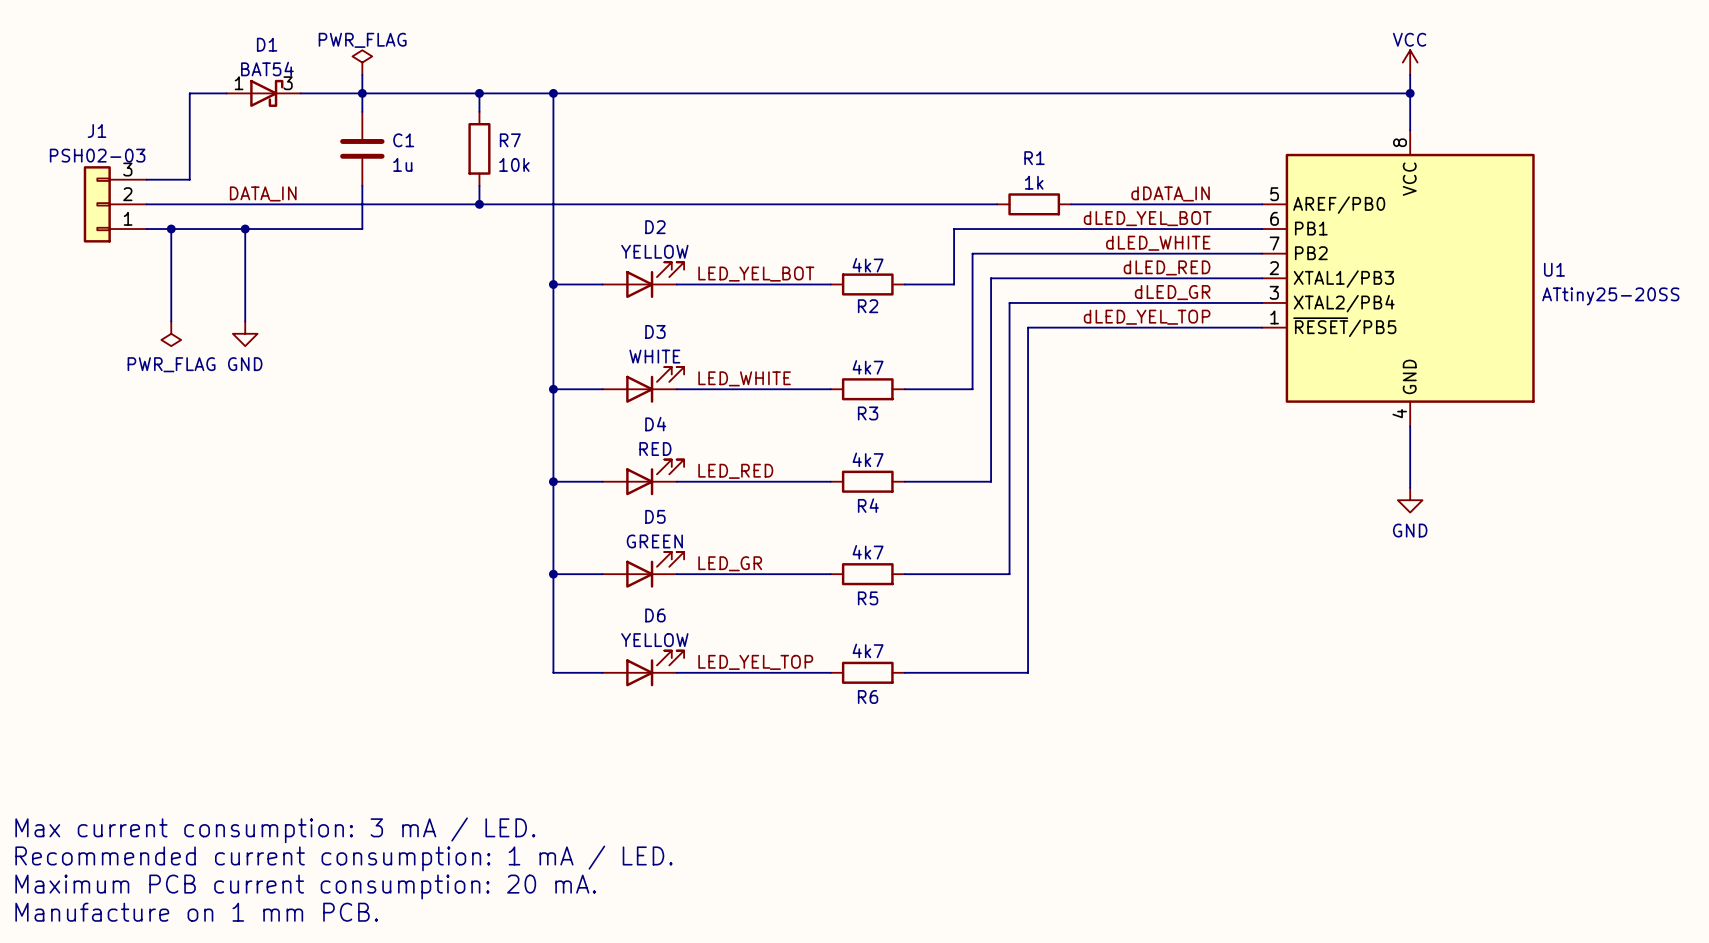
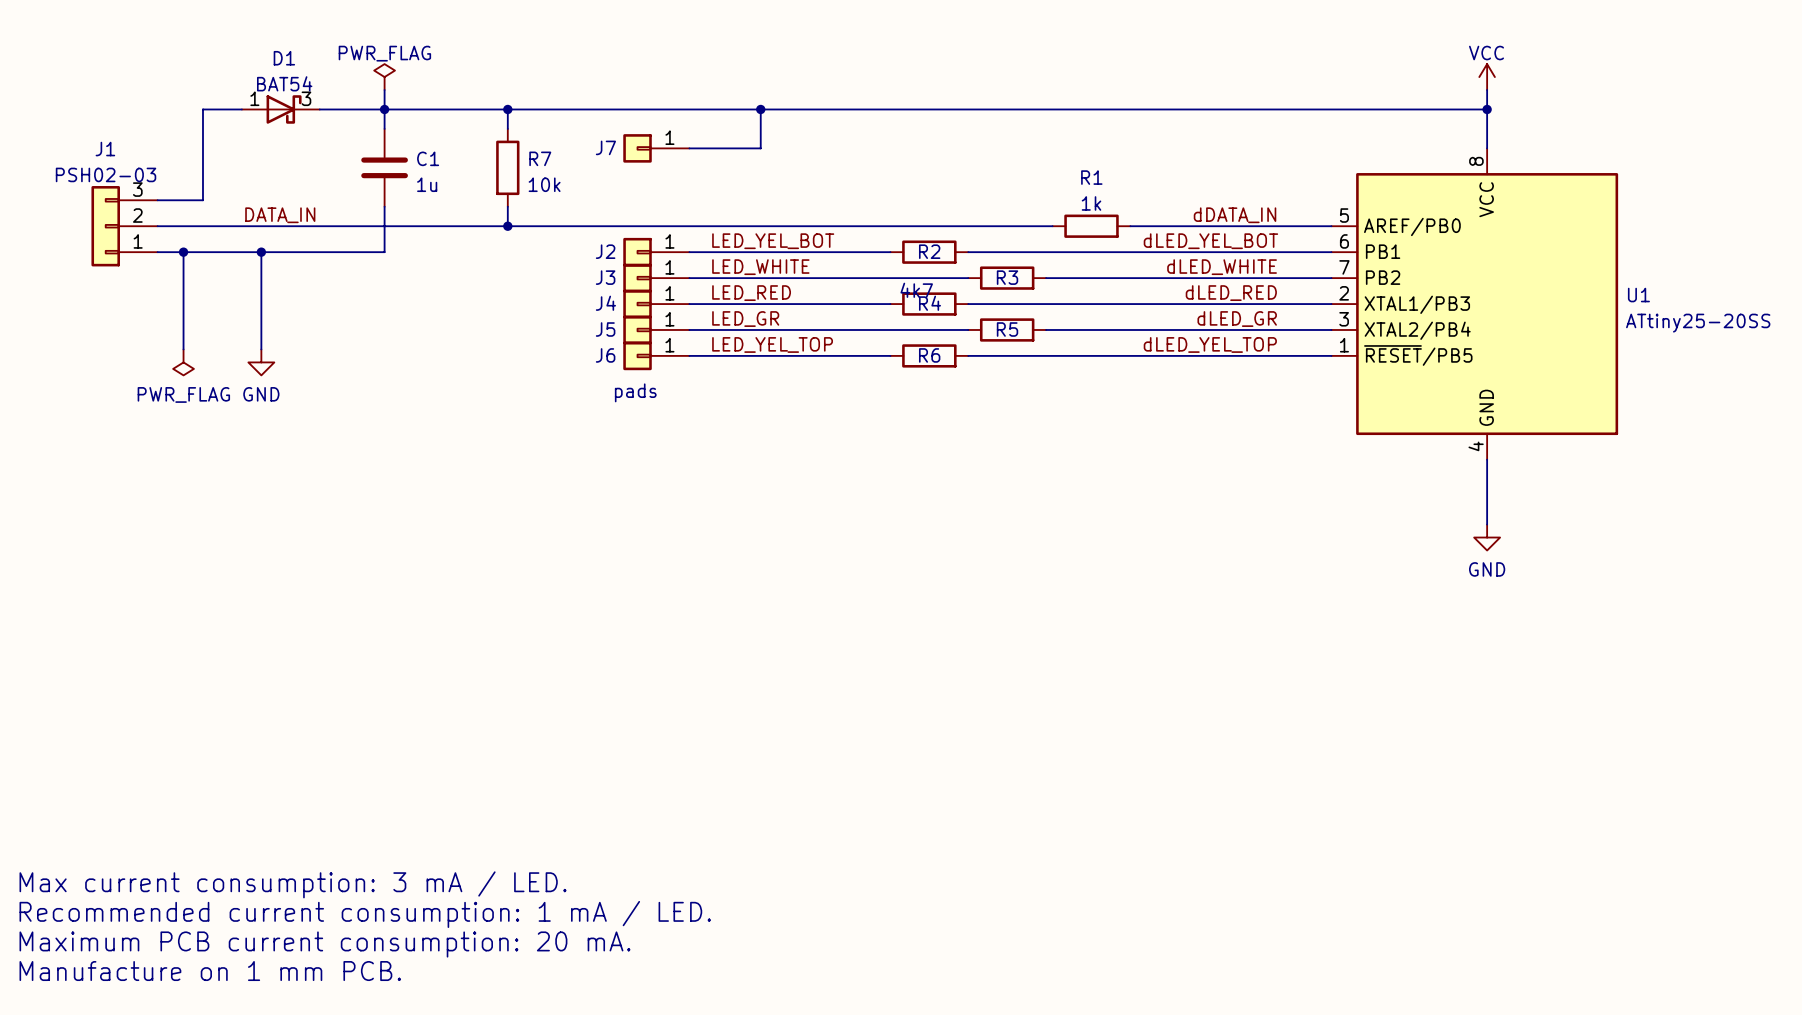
wire: (553, 93) (553, 672) (602, 672) -> none
junction: (553, 93) -> none
wire: none -> (760, 109) (760, 148) (689, 148)
junction: none -> (760, 109)
J7: none -> (656, 148)
J2: none -> (656, 252)
wire: none -> (689, 252) (890, 252)
wire: (954, 229) (954, 284) (904, 284) -> (1007, 252) (968, 252)
J3: none -> (656, 278)
wire: none -> (689, 278) (968, 278)
wire: (991, 253) (972, 253) (972, 389) (904, 389) -> none
label position: LED_YEL_BOT (756, 274) -> LED_YEL_BOT (773, 241)
J4: none -> (656, 304)
wire: none -> (689, 304) (890, 304)
wire: (991, 278) (991, 481) (904, 481) -> (1046, 304) (968, 304)
D2: YELLOW (643, 280) -> none
wire: (553, 284) (602, 284) -> none
junction: (553, 284) -> none
wire: (676, 284) (830, 284) -> none
R2 position: (867, 284) -> (929, 252)
label: none -> LED_GR (745, 319)
J5: none -> (656, 329)
wire: none -> (689, 329) (968, 329)
wire: (1009, 302) (1009, 574) (904, 574) -> (1065, 329) (1046, 329)
R2 name position: R2 (868, 306) -> R2 (929, 251)
label: none -> LED_YEL_TOP (772, 344)
J6: none -> (656, 355)
wire: none -> (689, 355) (890, 355)
wire: (1028, 327) (1028, 672) (904, 672) -> (1085, 355) (968, 355)
text: none -> pads (635, 392)
R3 value: 4k7 (868, 367) -> none
label position: LED_WHITE (744, 378) -> LED_WHITE (760, 267)
D3: WHITE (643, 384) -> none
wire: (553, 389) (602, 389) -> none
junction: (553, 389) -> none
wire: (676, 389) (830, 389) -> none
R3 position: (867, 389) -> (1007, 278)
R3 name position: R3 (868, 413) -> R3 (1007, 277)
R4 value: 4k7 (868, 459) -> none
label position: LED_RED (735, 471) -> LED_RED (751, 293)
D4: RED (643, 477) -> none
wire: (553, 481) (602, 481) -> none
junction: (553, 481) -> none
wire: (676, 481) (830, 481) -> none
R4 position: (867, 481) -> (929, 304)
R4 name position: R4 (868, 505) -> R4 (929, 303)
R5 value: 4k7 (868, 552) -> none
label: LED_GR (730, 563) -> none
D5: GREEN (643, 569) -> none
wire: (553, 574) (602, 574) -> none
junction: (553, 574) -> none
wire: (676, 574) (830, 574) -> none
R5 position: (867, 574) -> (1007, 329)
R5 name position: R5 (868, 598) -> R5 (1007, 329)
R6 value: 4k7 (868, 650) -> none
label: LED_YEL_TOP (755, 662) -> none
D6: YELLOW (643, 668) -> none
wire: (676, 672) (830, 672) -> none
R6 position: (867, 672) -> (929, 355)
R6 name position: R6 (868, 697) -> R6 (929, 355)

